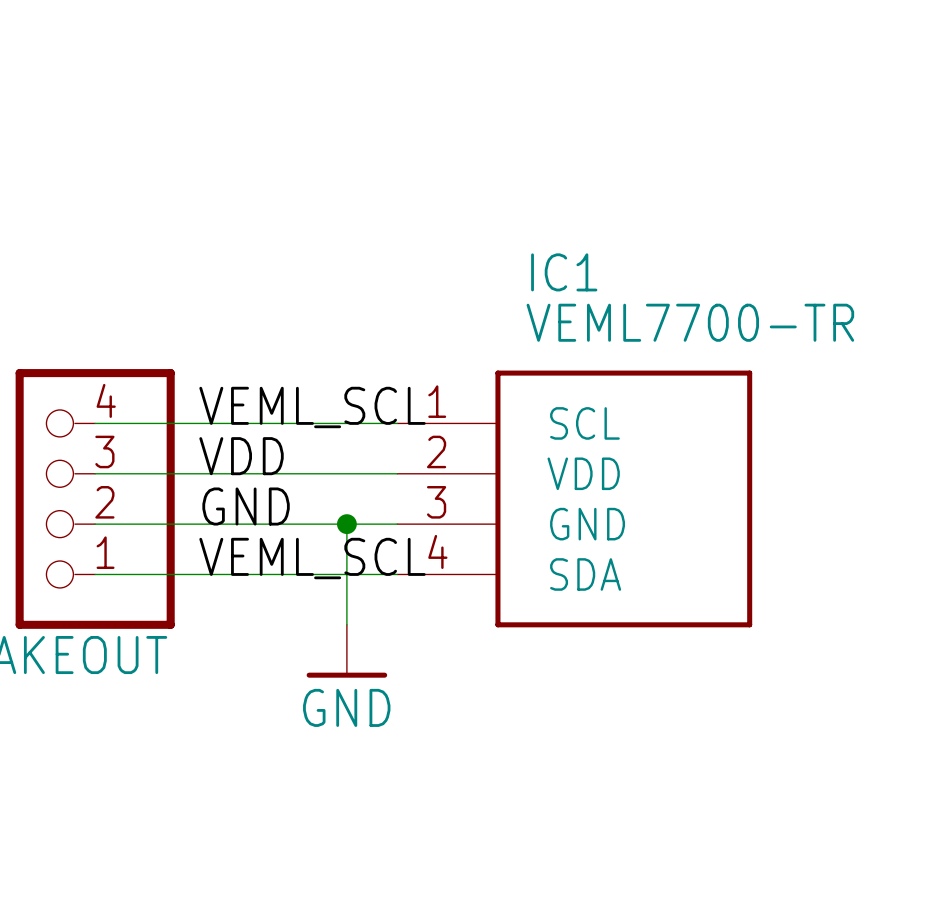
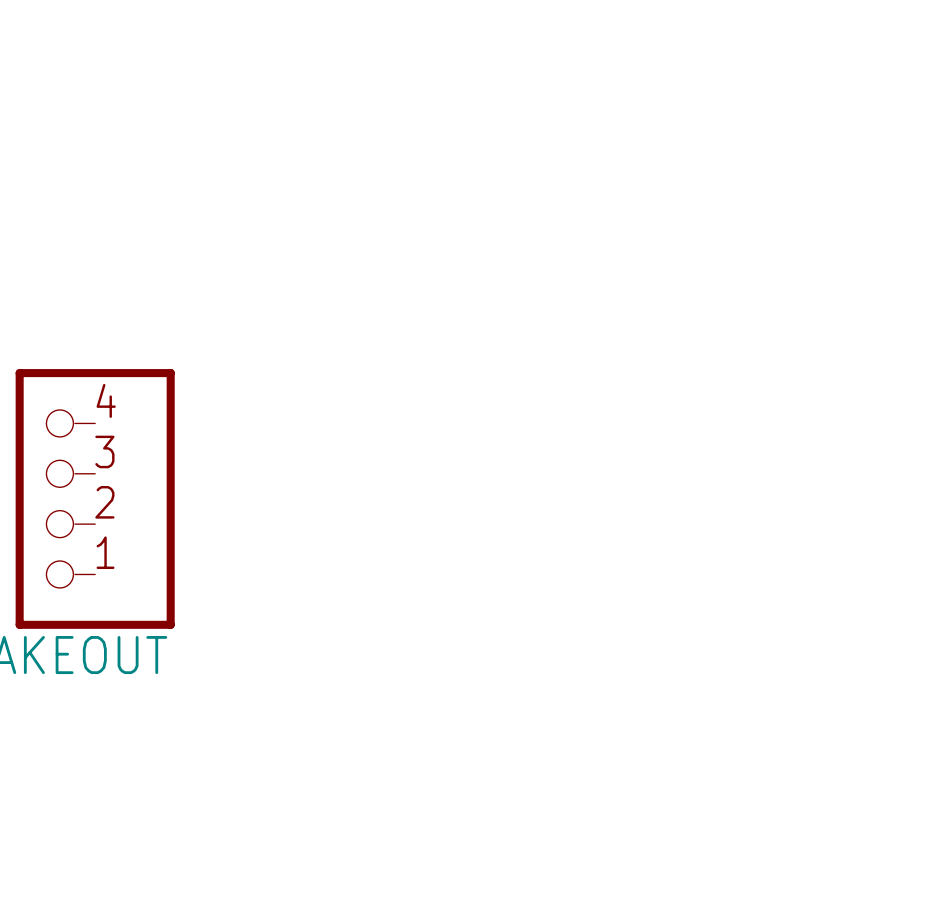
label: VEML_SCL (312, 407) -> none
wire: (95, 423) (397, 423) -> none
label: VDD (241, 456) -> none
wire: (95, 473) (397, 473) -> none
IC1: VEML7700-TR (574, 498) -> none
label: GND (246, 506) -> none
wire: (95, 524) (397, 524) -> none
wire: (346, 524) (346, 624) -> none
junction: (346, 524) -> none
label: VEML_SCL (312, 558) -> none
wire: (95, 574) (397, 574) -> none
power symbol: GND (346, 651) -> none

